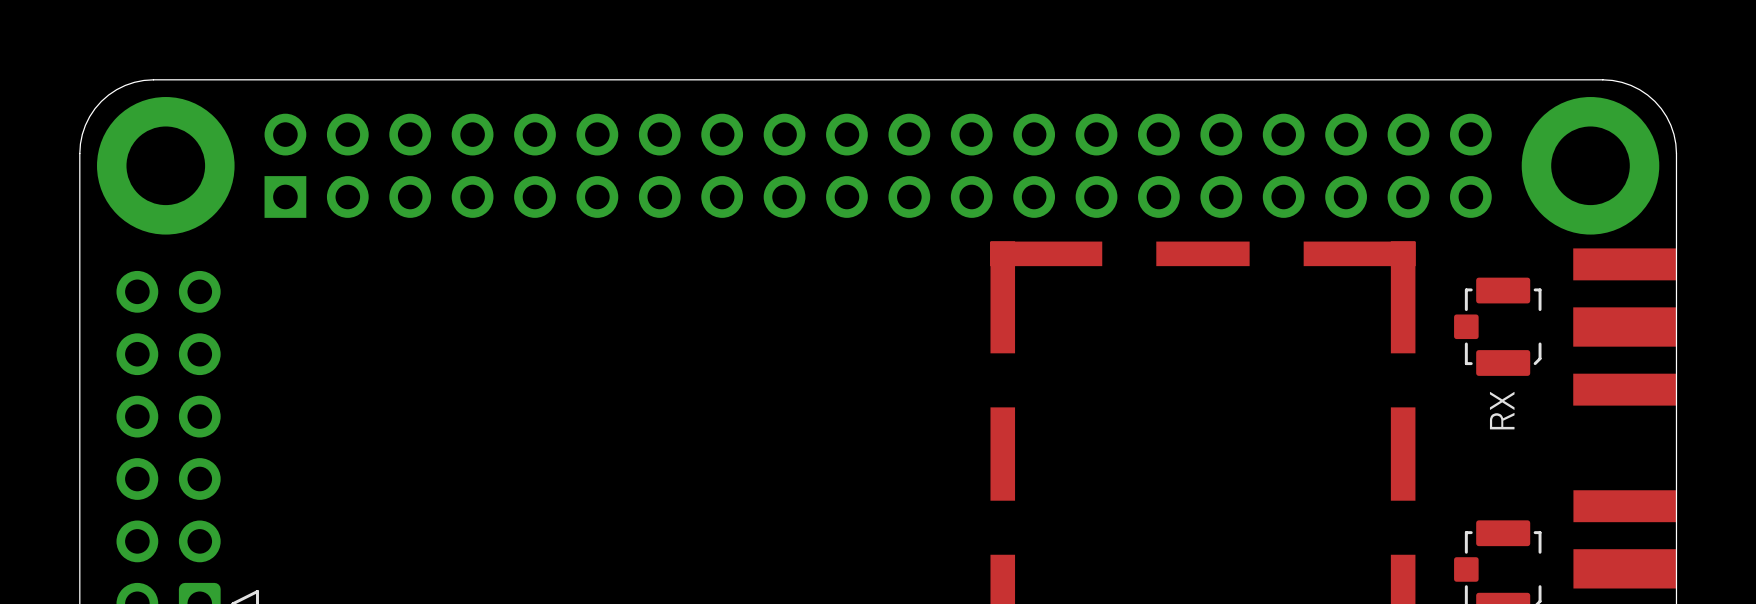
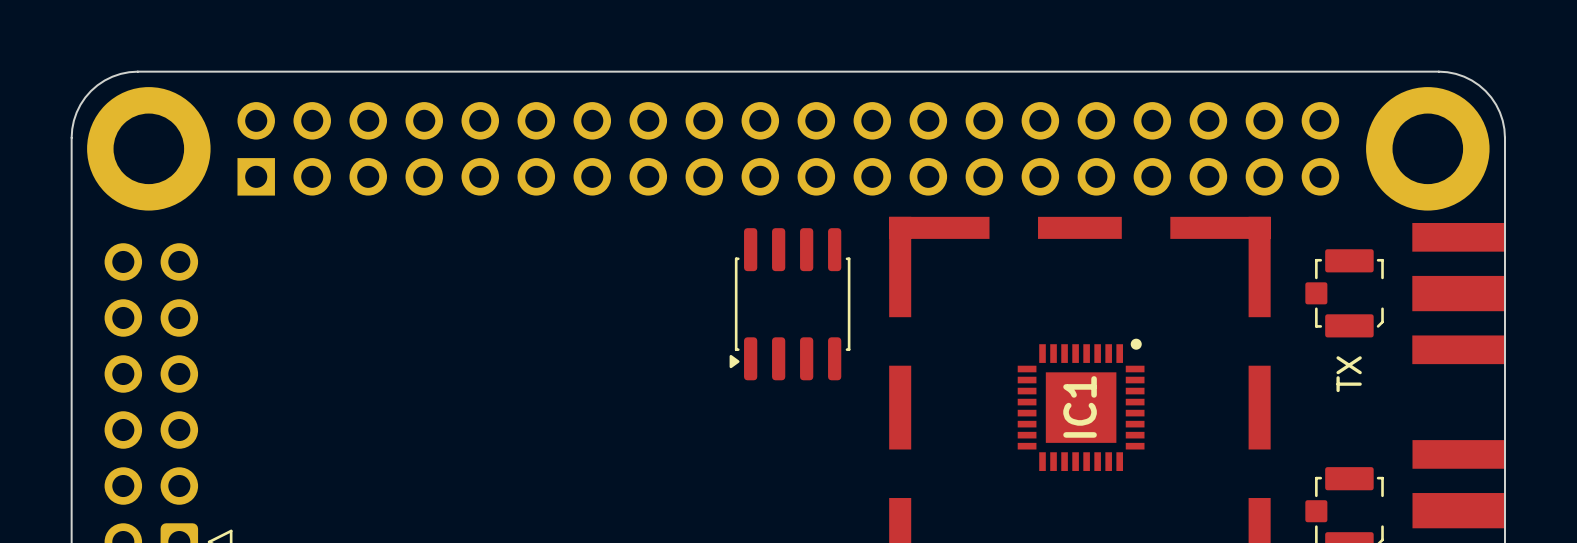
part: none -> (790, 304)
text: RX (1502, 410) -> TX (1349, 374)
IC1: none -> (1081, 404)

